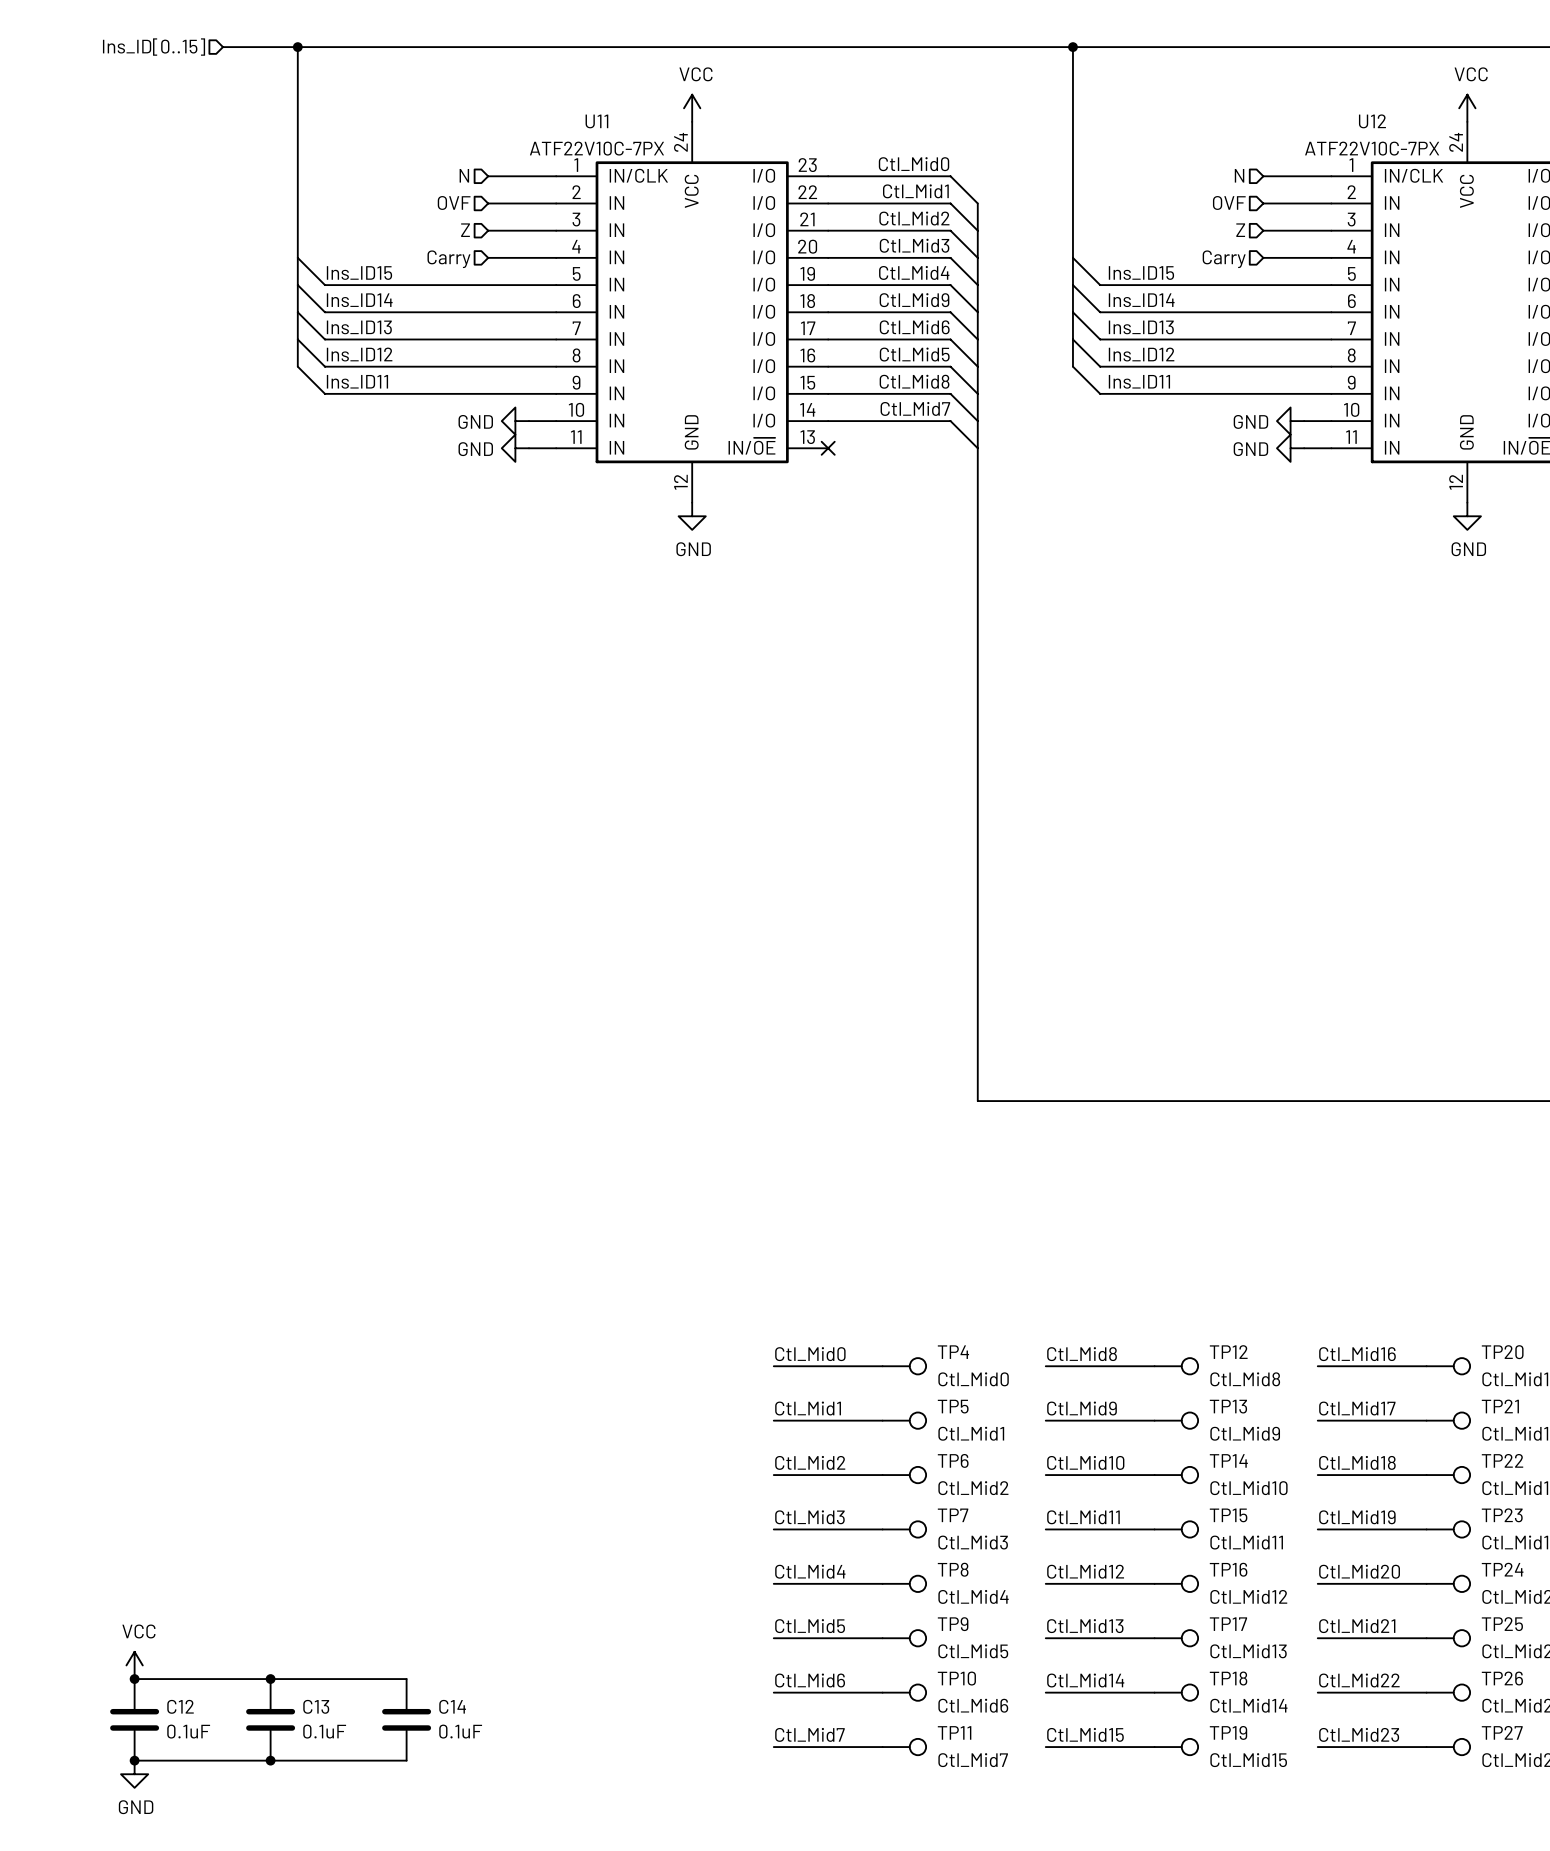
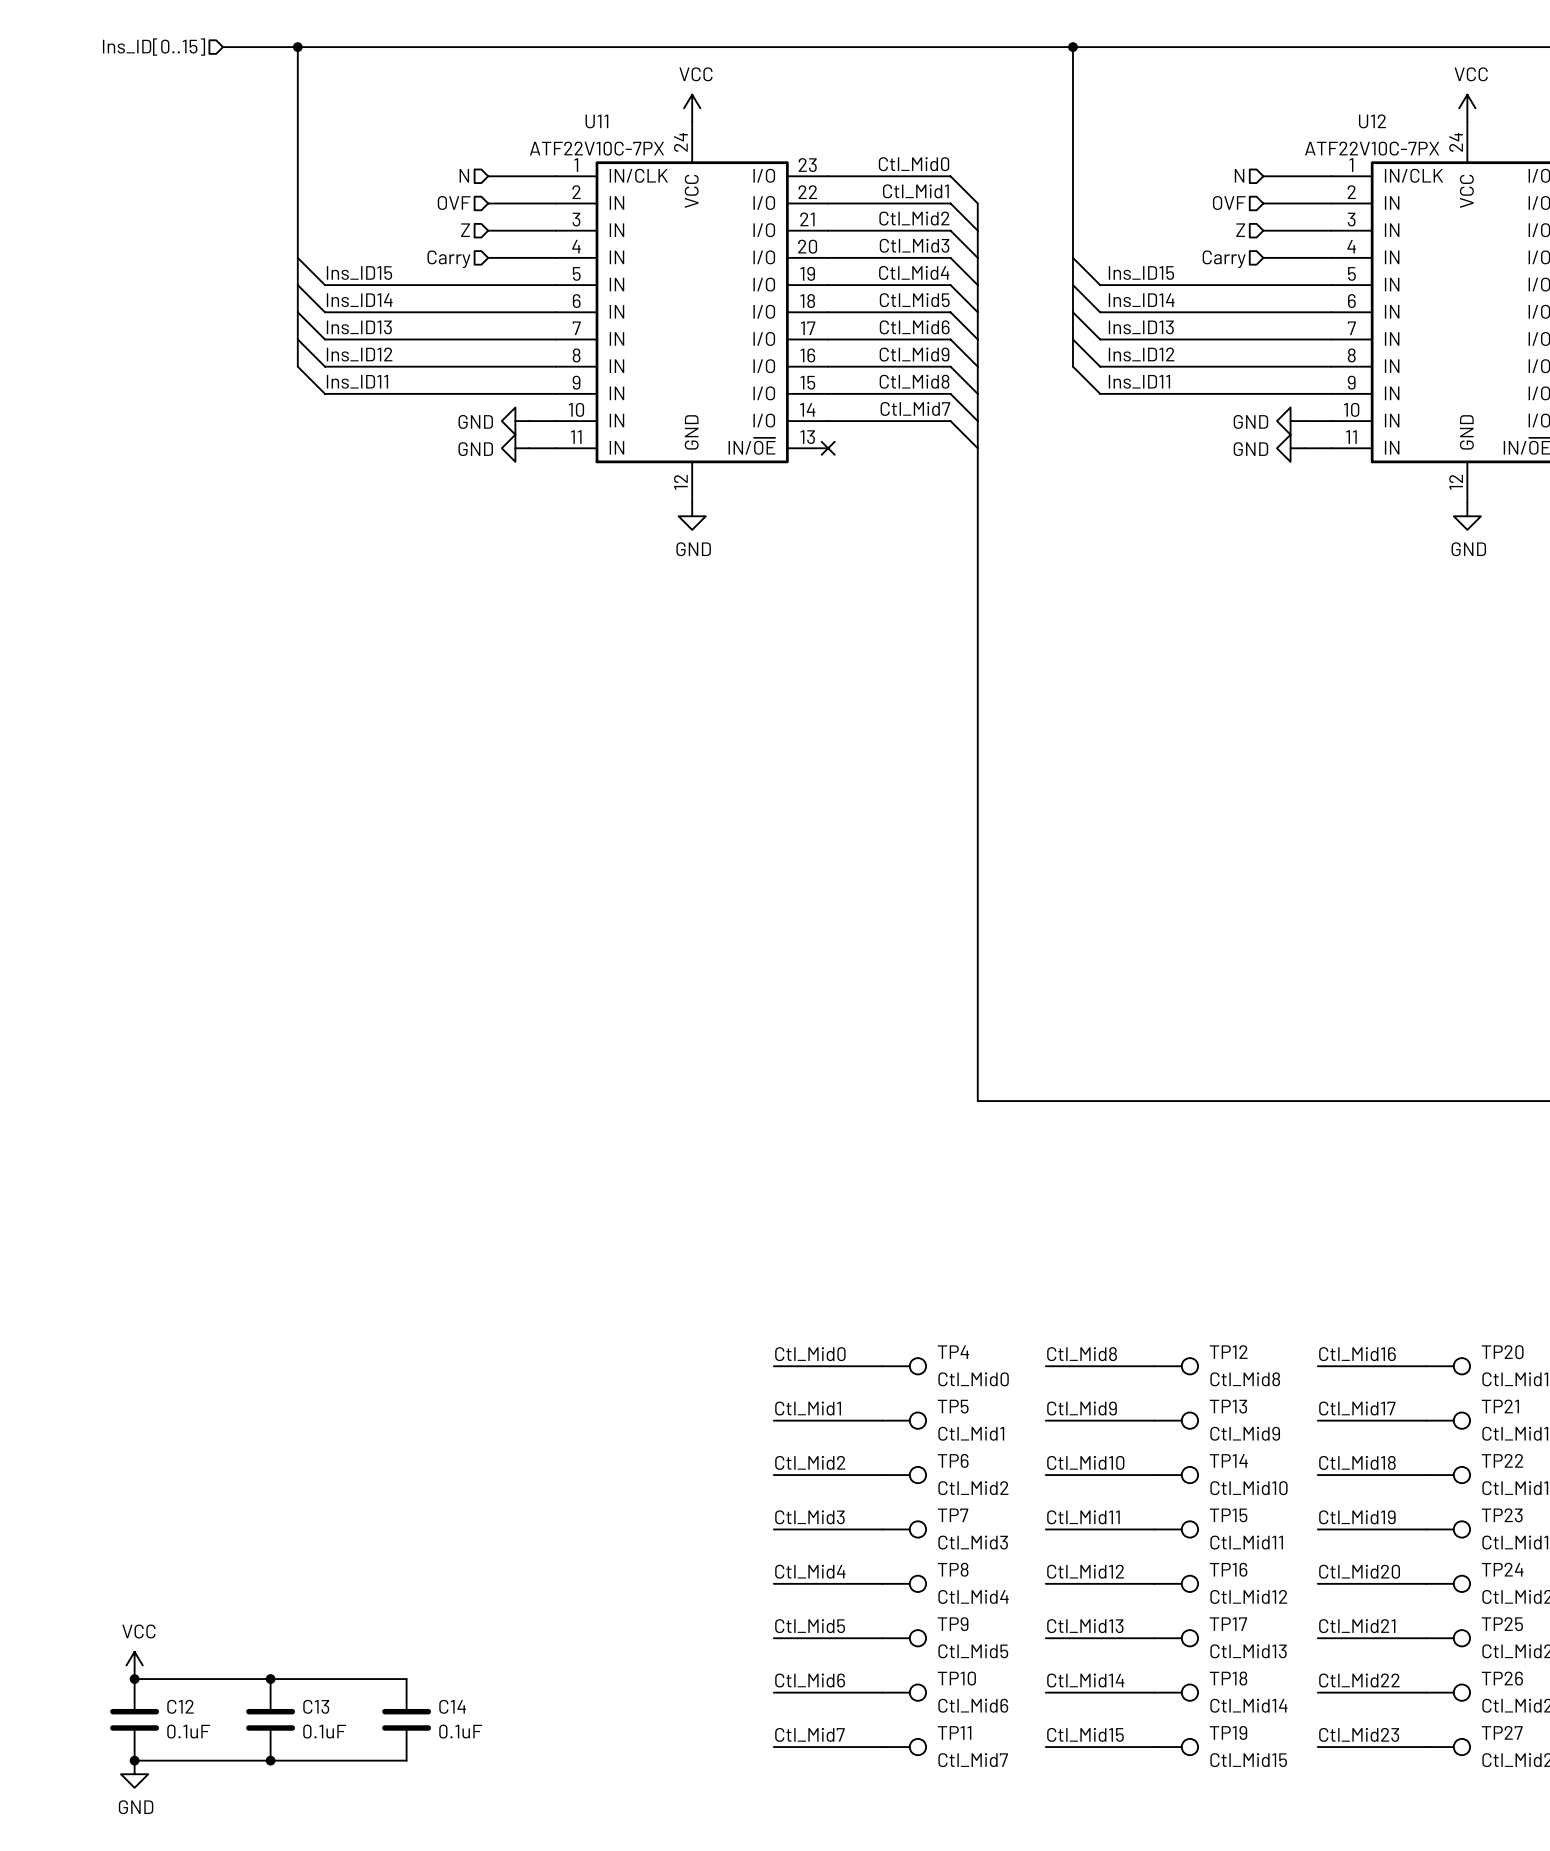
label: Ctl_Mid9 (914, 300) -> Ctl_Mid5 (914, 300)
label: Ctl_Mid5 (914, 354) -> Ctl_Mid9 (914, 354)

